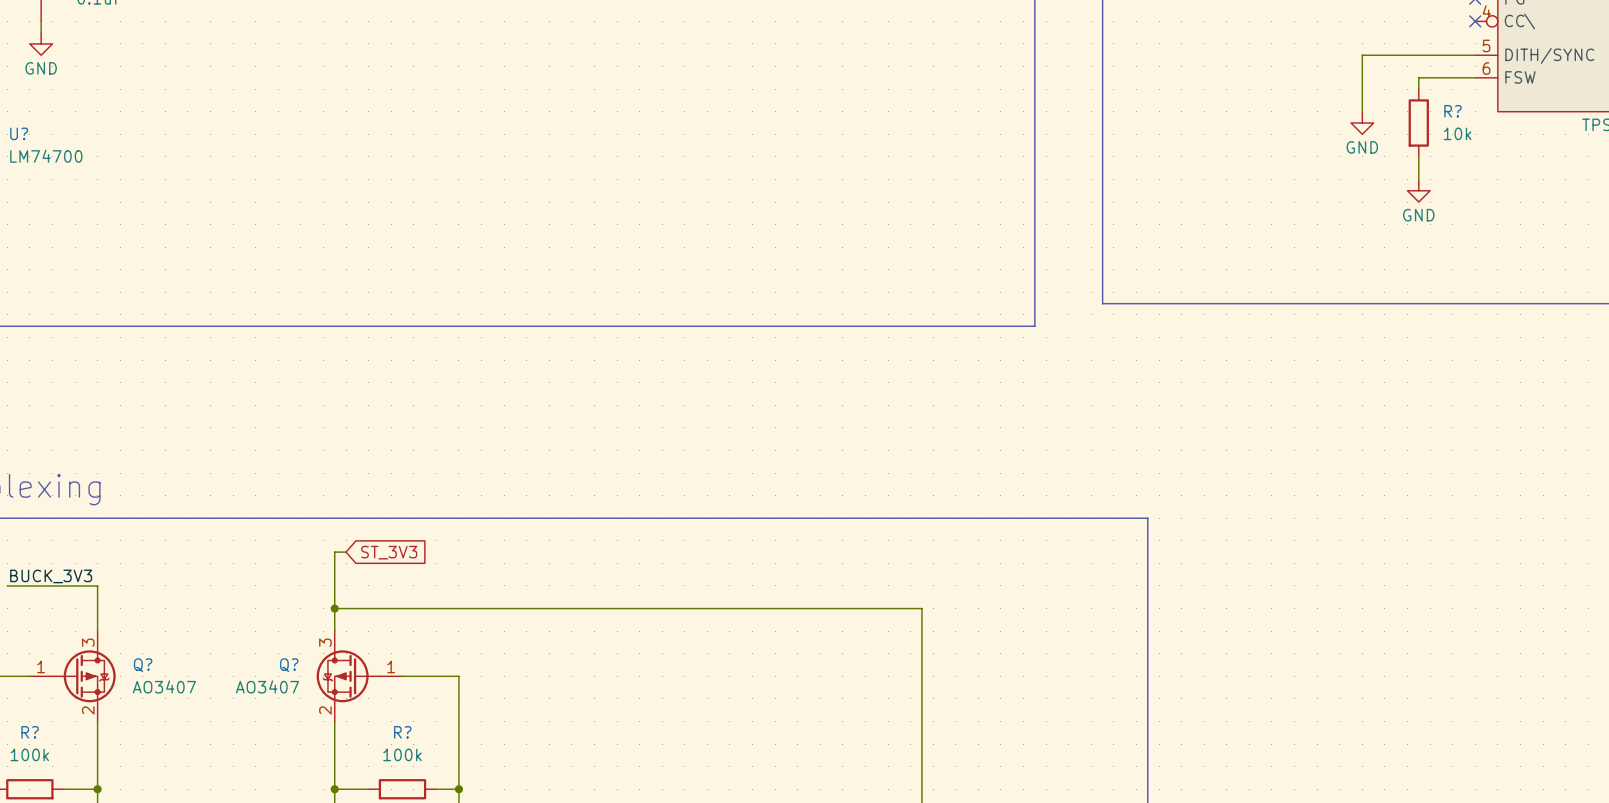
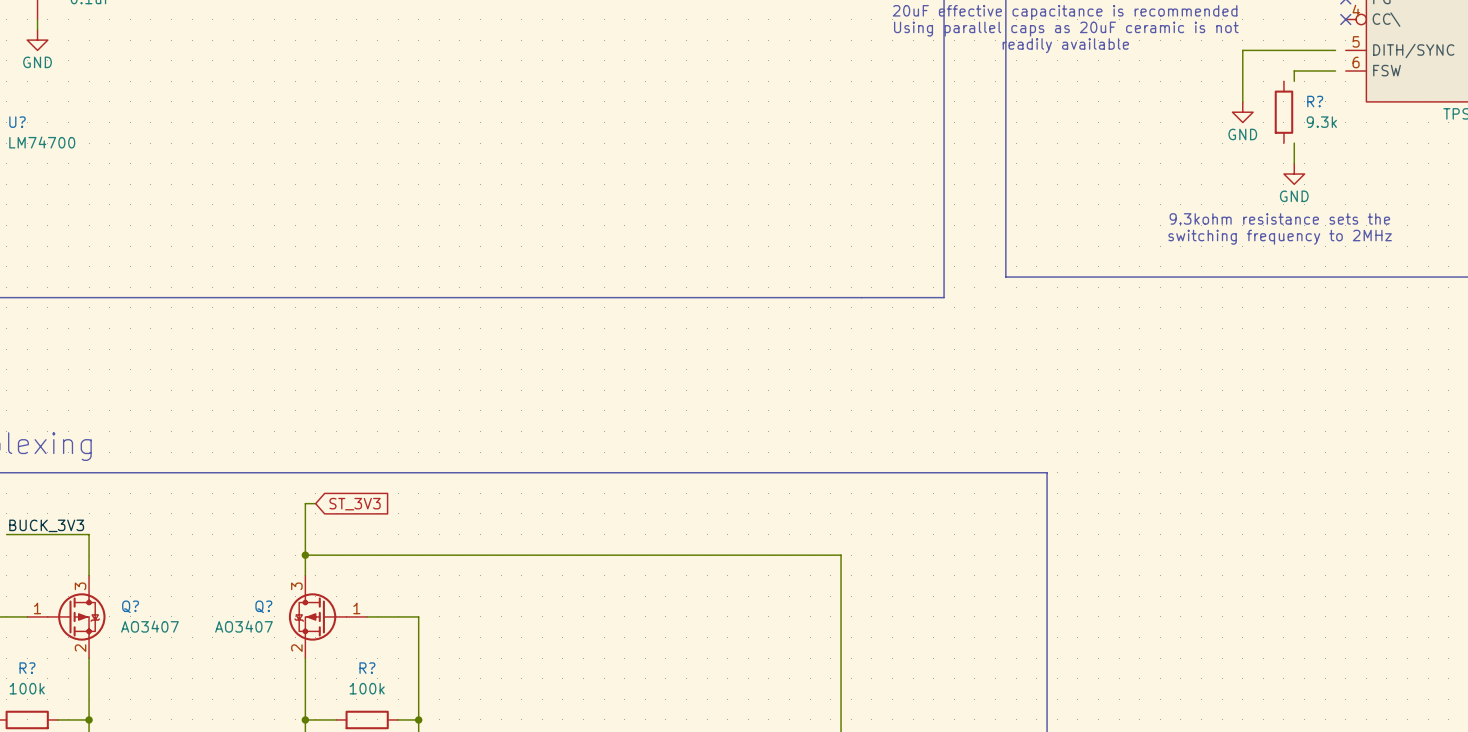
text: none -> 20uF effective capacitance is recommended (1065, 12)
text: none -> Using parallel caps as 20uF ceramic is not (1066, 29)
text: none -> readily available (1065, 45)
wire: (1463, 55) (1475, 55) -> none
wire: (1463, 77) (1475, 77) -> none
R?: none -> 9.3k (1283, 112)
R?: 10k (1418, 123) -> none
text: none -> 9.3kohm resistance sets the (1279, 218)
text: none -> switching frequency to 2MHz (1280, 237)

